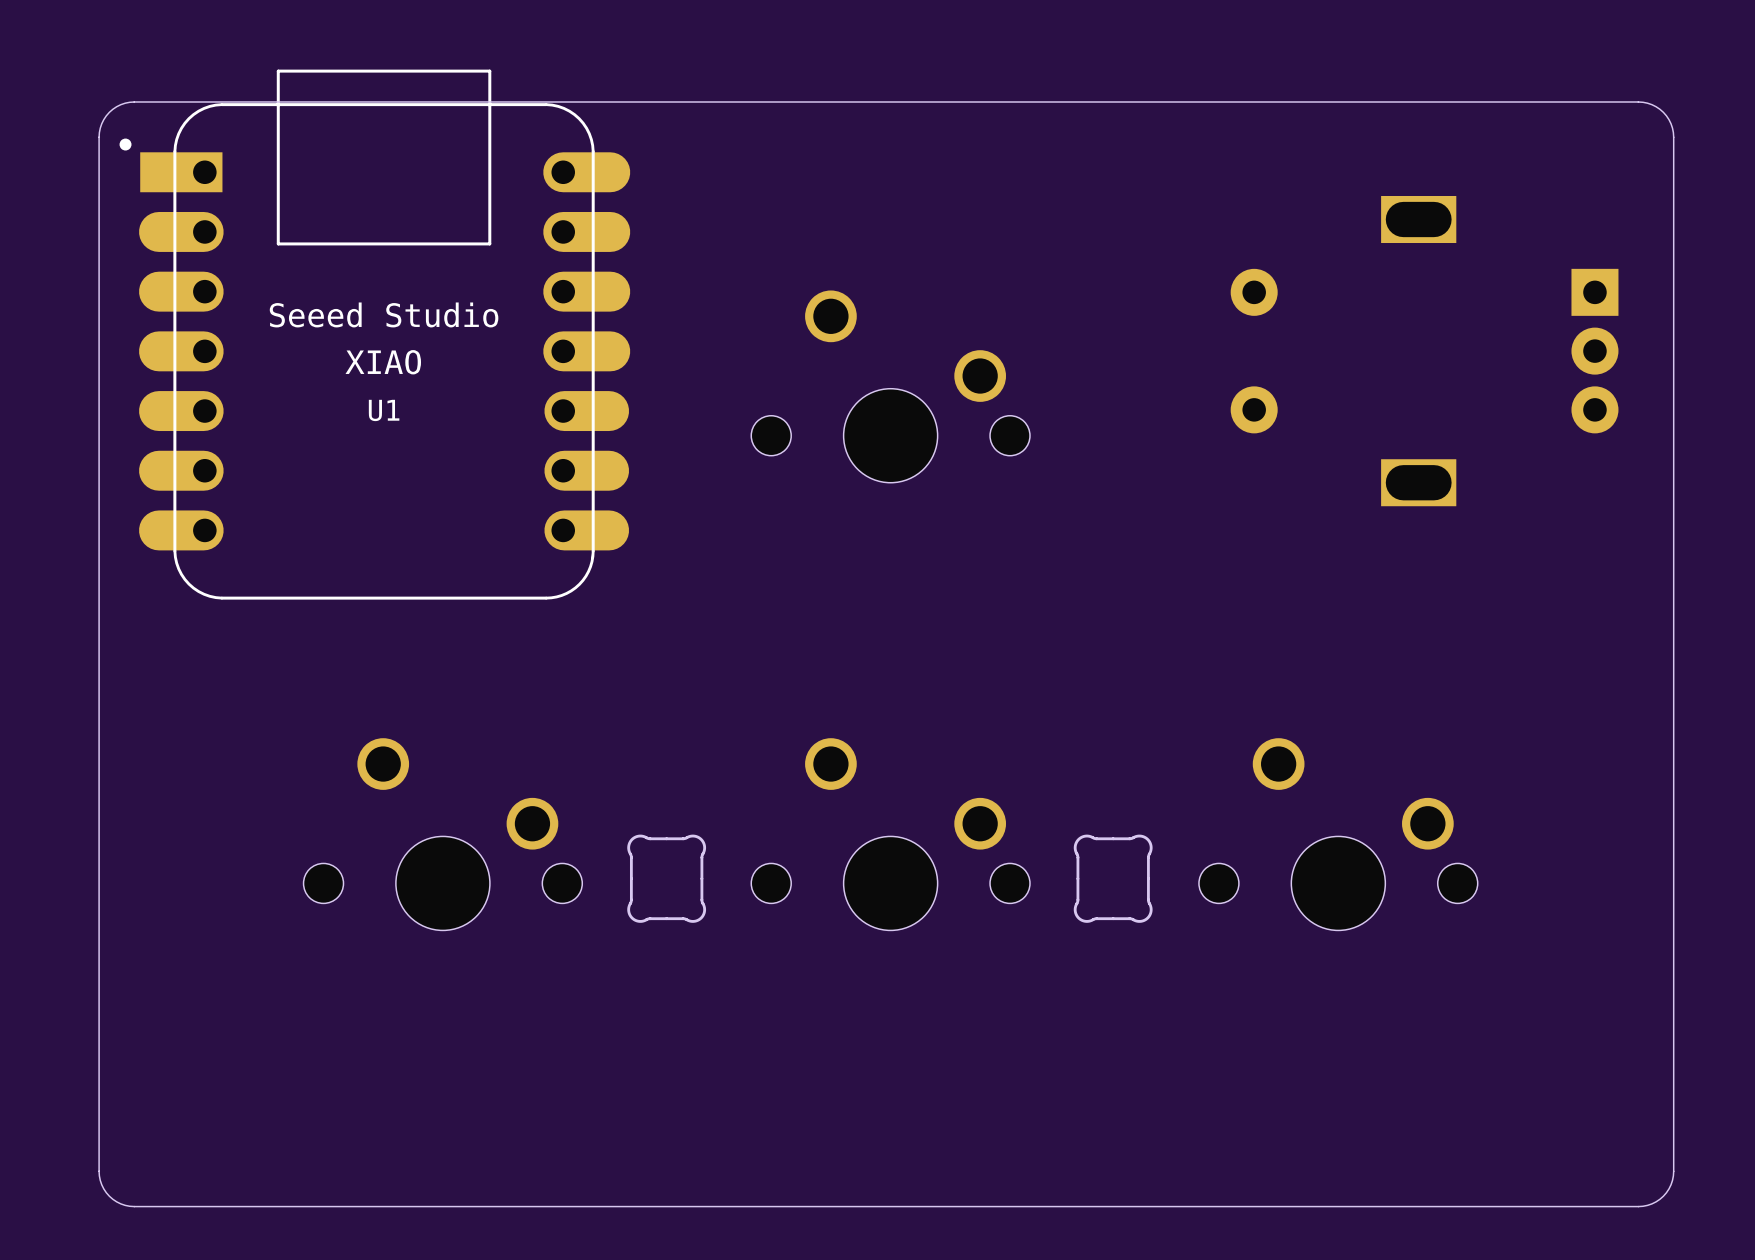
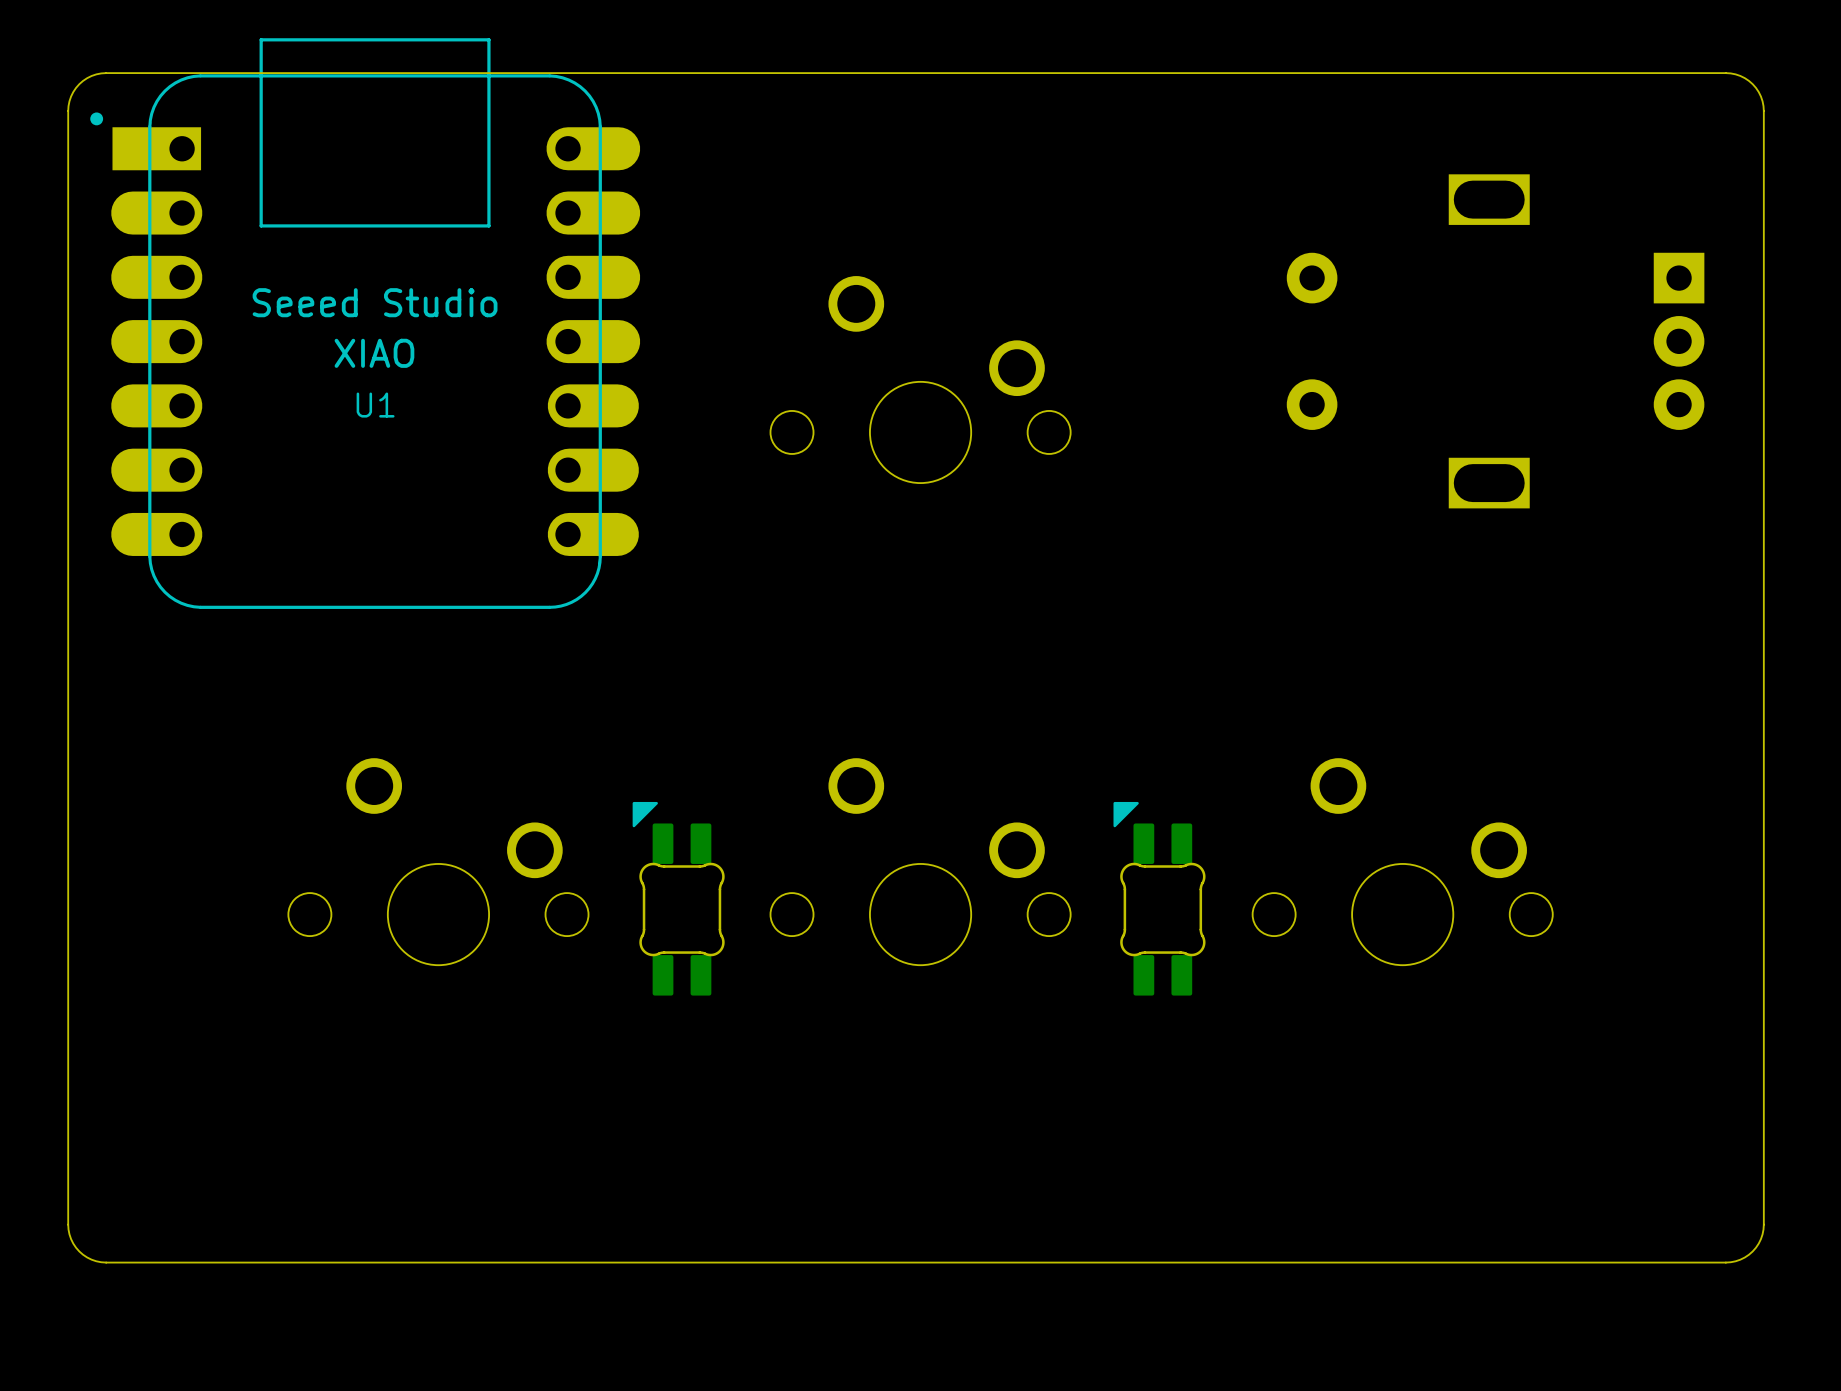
part footprint: [627, 834, 707, 923] -> [632, 801, 725, 996]
part footprint: [1073, 834, 1153, 923] -> [1113, 801, 1206, 996]

